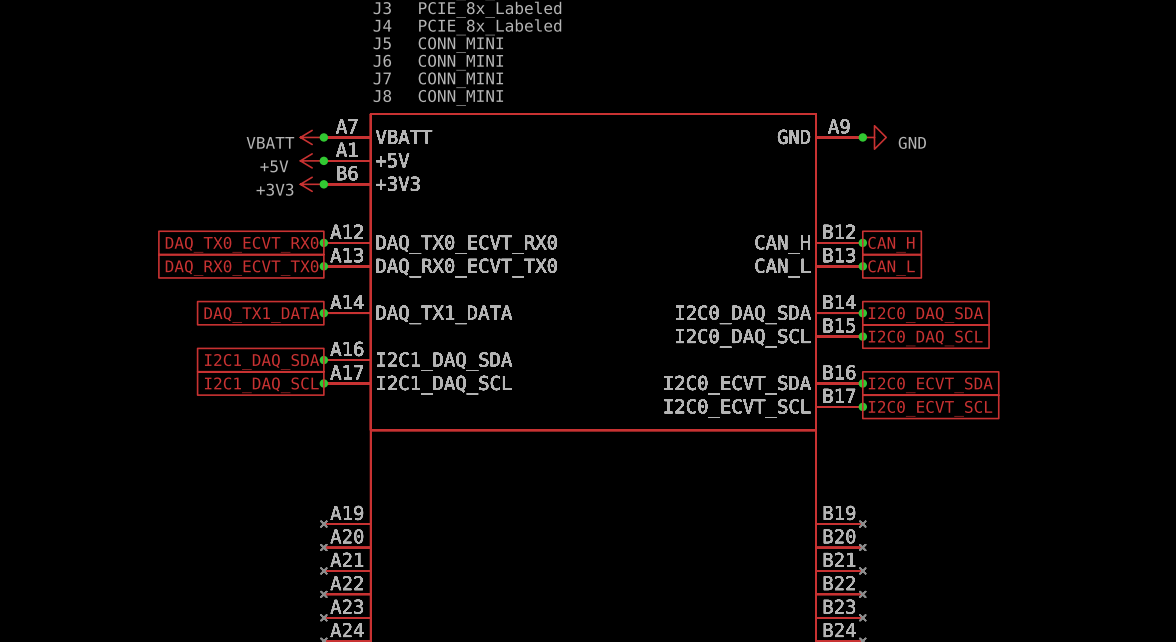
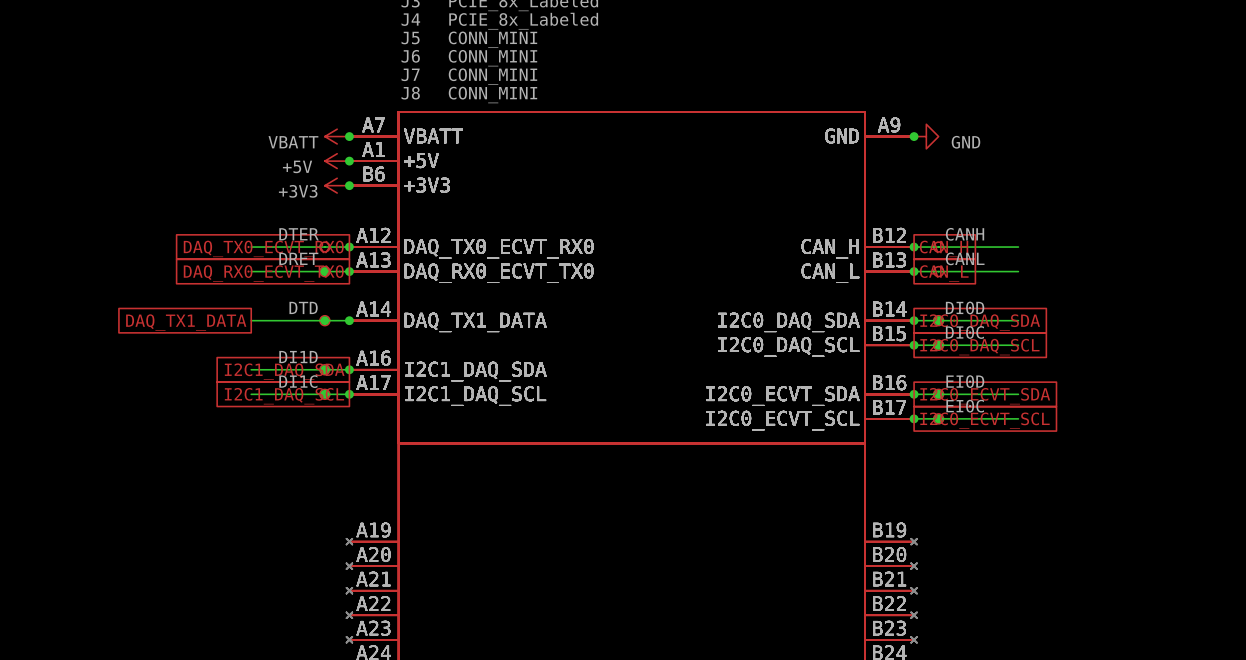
wire: none -> (251, 247) (349, 247)
part: none -> DTER (324, 247)
wire: none -> (914, 247) (1018, 247)
part: none -> CANH (938, 247)
wire: none -> (251, 271) (349, 271)
junction: none -> (324, 271)
part: none -> DRET (324, 271)
wire: none -> (914, 271) (1018, 271)
part: none -> CANL (938, 271)
wire: none -> (251, 320) (349, 320)
junction: none -> (324, 320)
part: none -> DTD (324, 320)
wire: none -> (914, 320) (1018, 320)
junction: none -> (938, 320)
part: none -> DI0D (938, 320)
global label position: DAQ_TX1_DATA (261, 314) -> DAQ_TX1_DATA (186, 322)
wire: none -> (914, 345) (1018, 345)
junction: none -> (938, 345)
part: none -> DI0C (938, 345)
wire: none -> (251, 369) (349, 369)
junction: none -> (324, 369)
part: none -> DI1D (324, 369)
wire: none -> (251, 394) (349, 394)
junction: none -> (324, 394)
part: none -> DI1C (324, 394)
wire: none -> (914, 394) (1018, 394)
junction: none -> (938, 394)
part: none -> EI0D (938, 394)
wire: none -> (914, 418) (1018, 418)
junction: none -> (938, 418)
part: none -> EI0C (938, 418)

